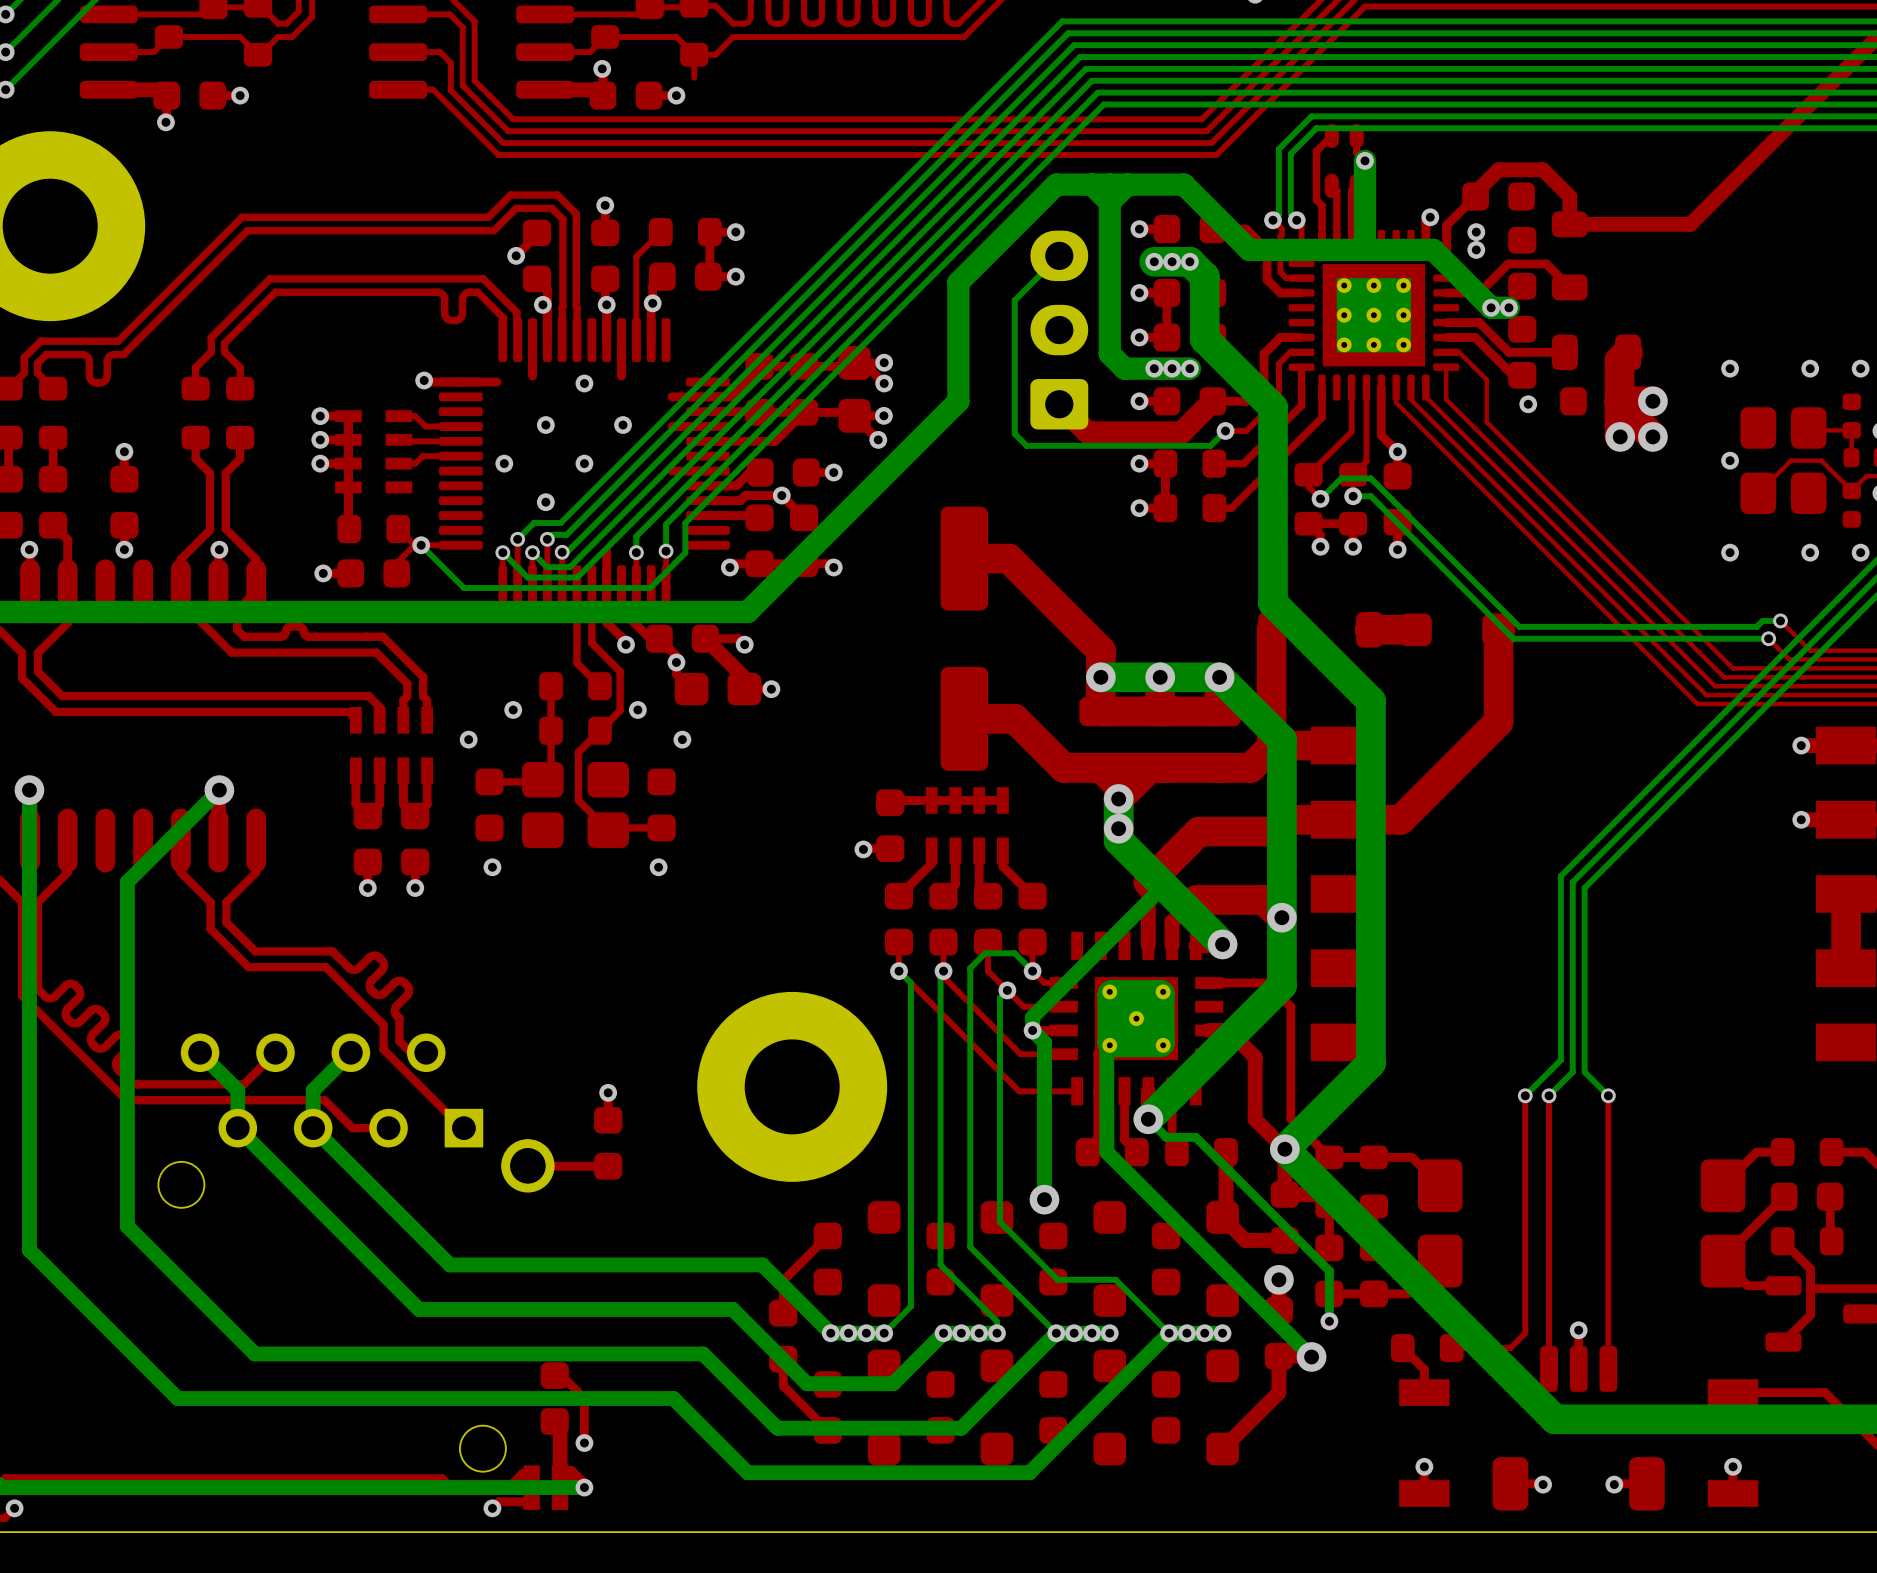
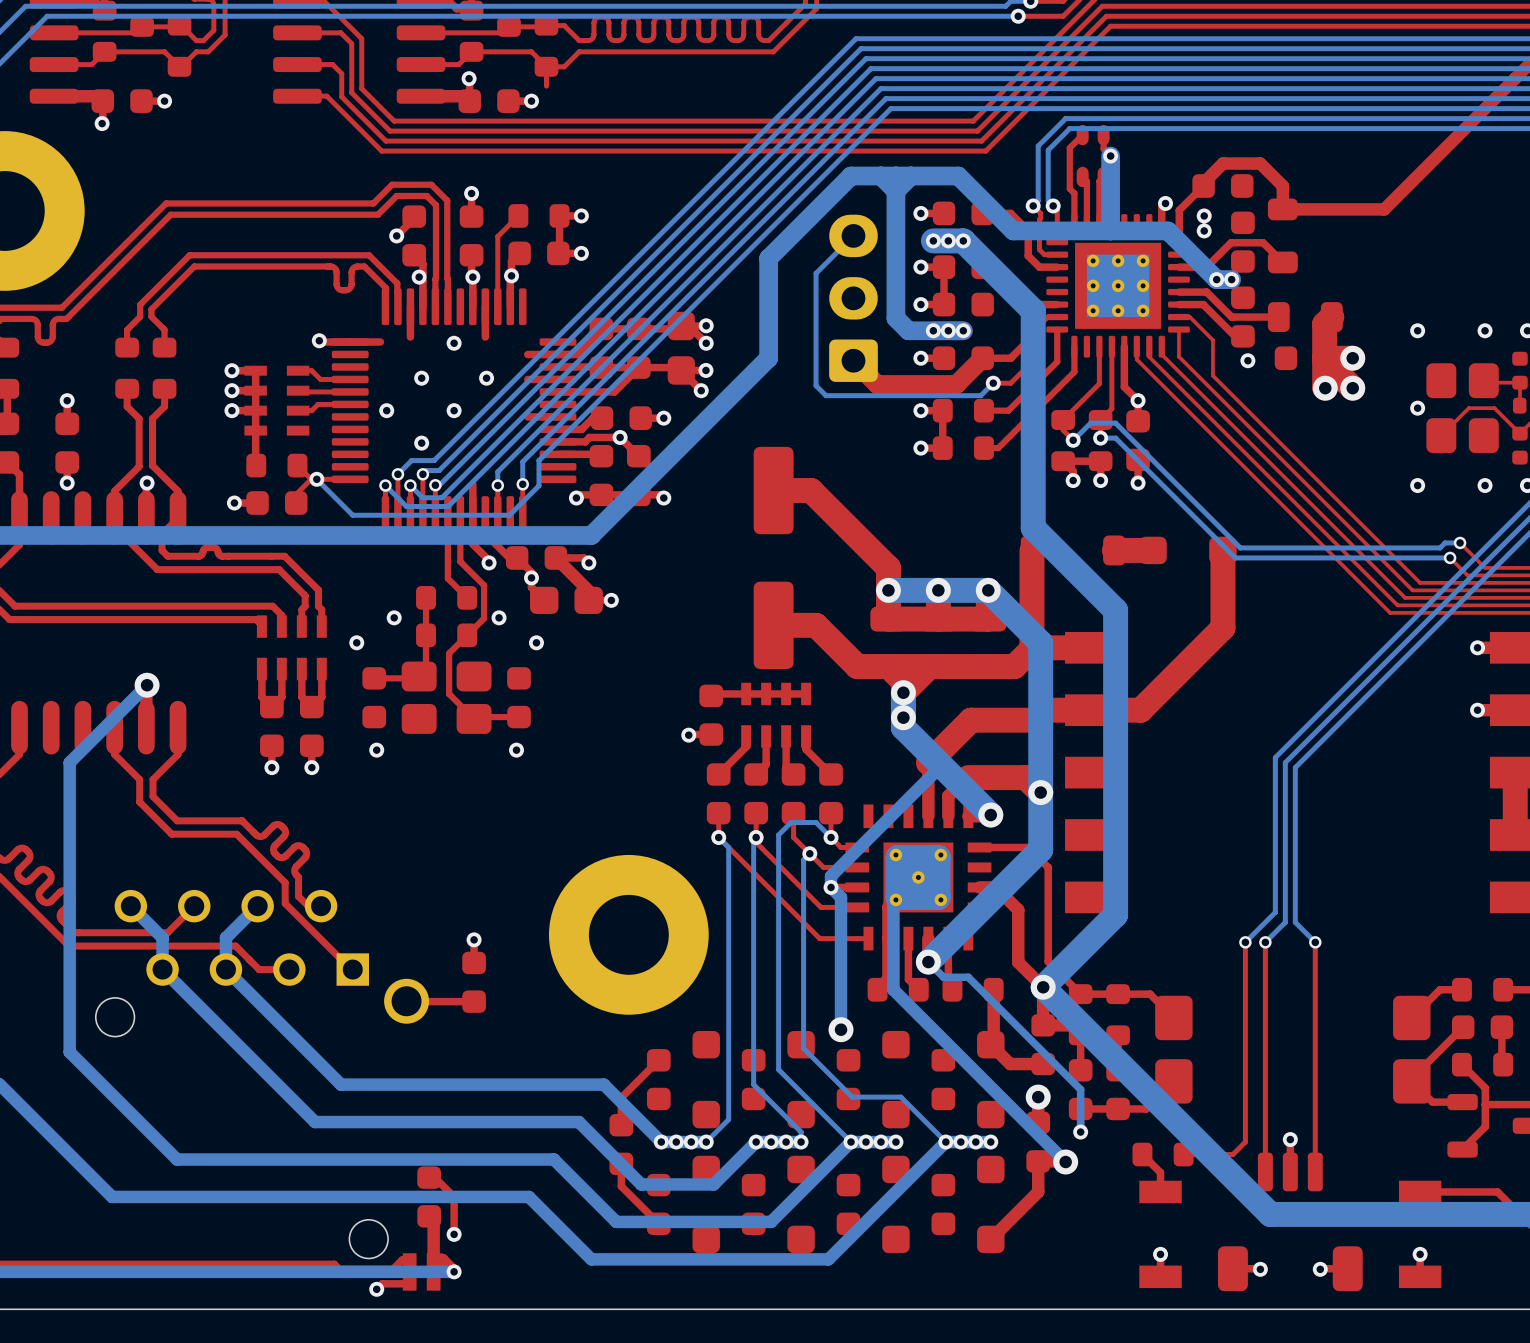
bottom track: (1204, 276) (1204, 338) (1273, 407) -> (975, 253) (1033, 310) (1033, 363)

